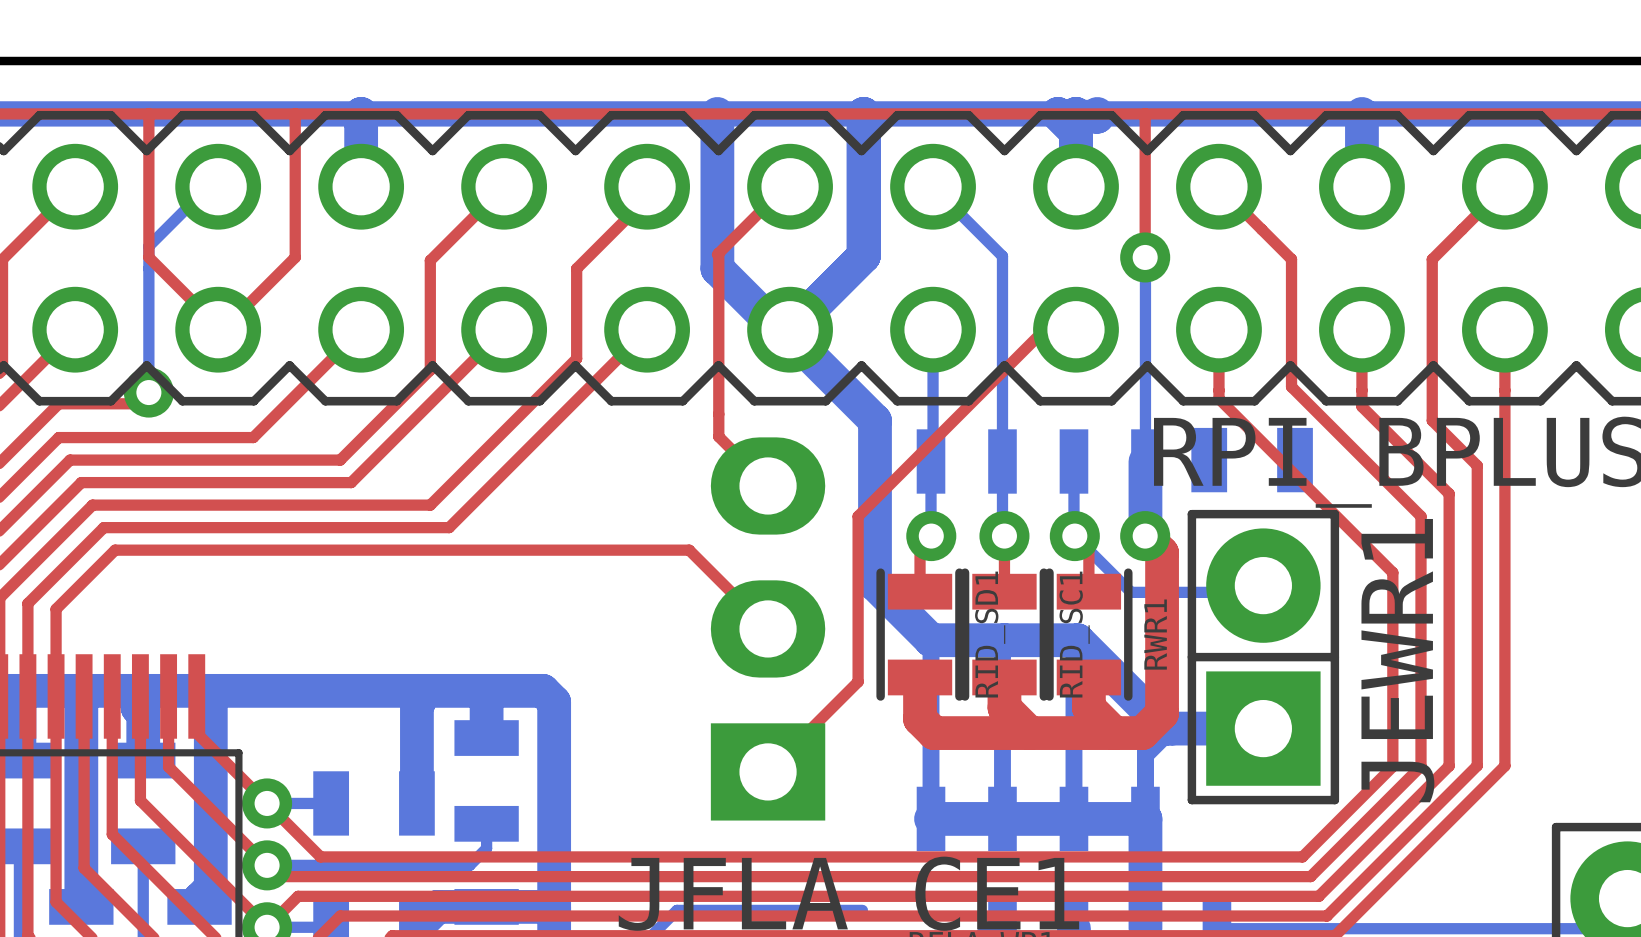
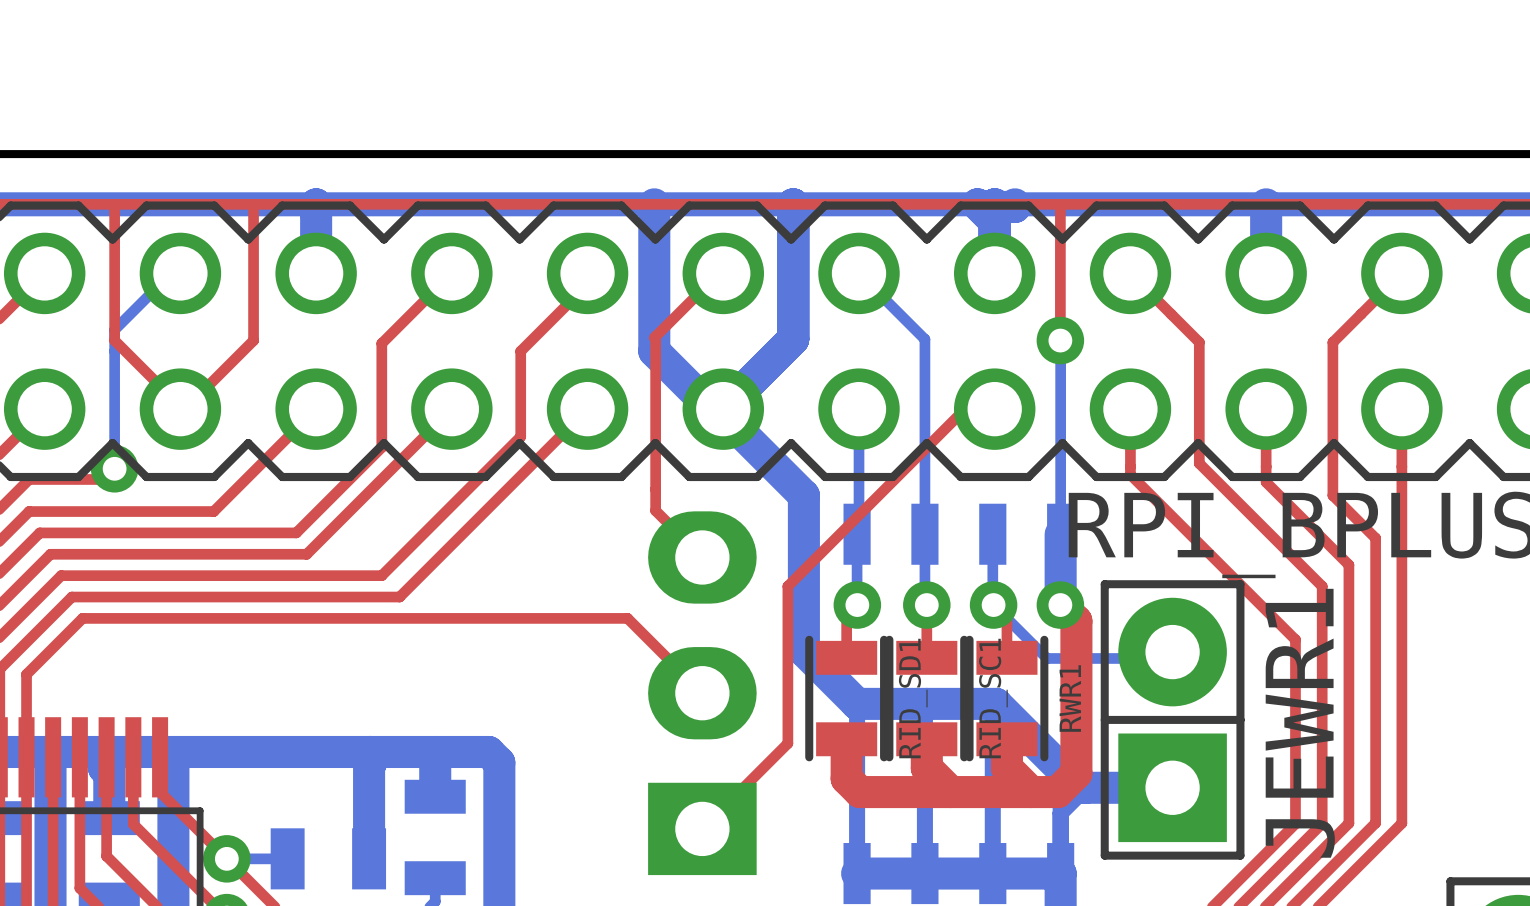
part: (1252, 460) -> none

